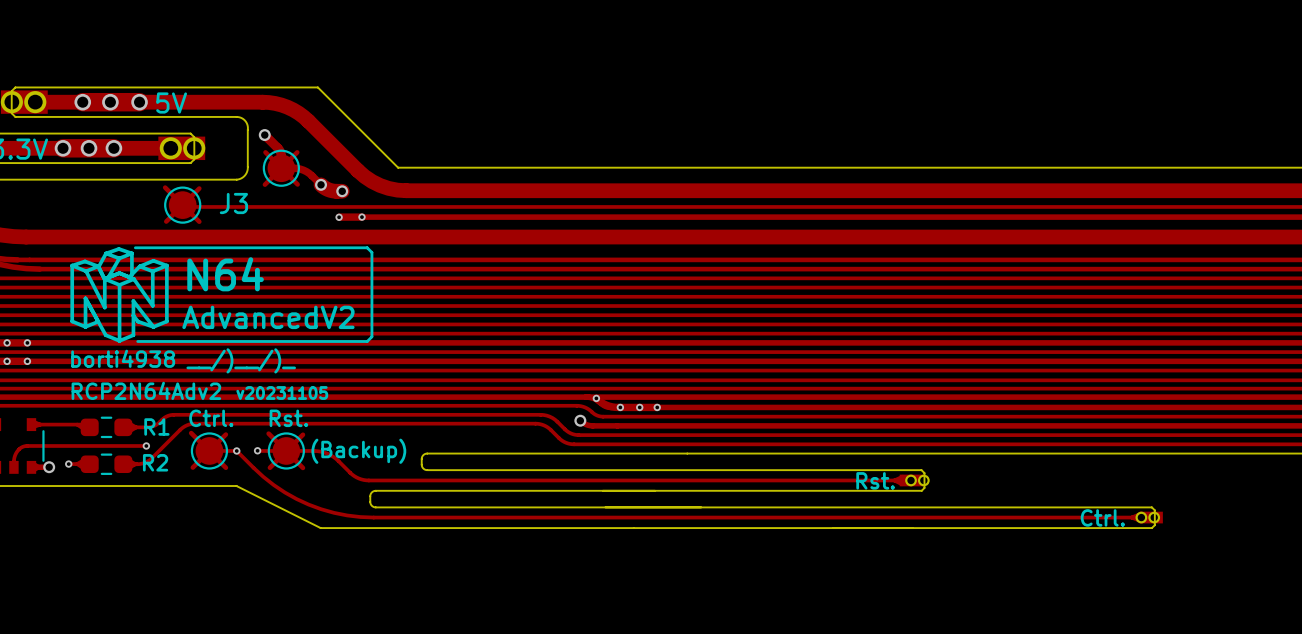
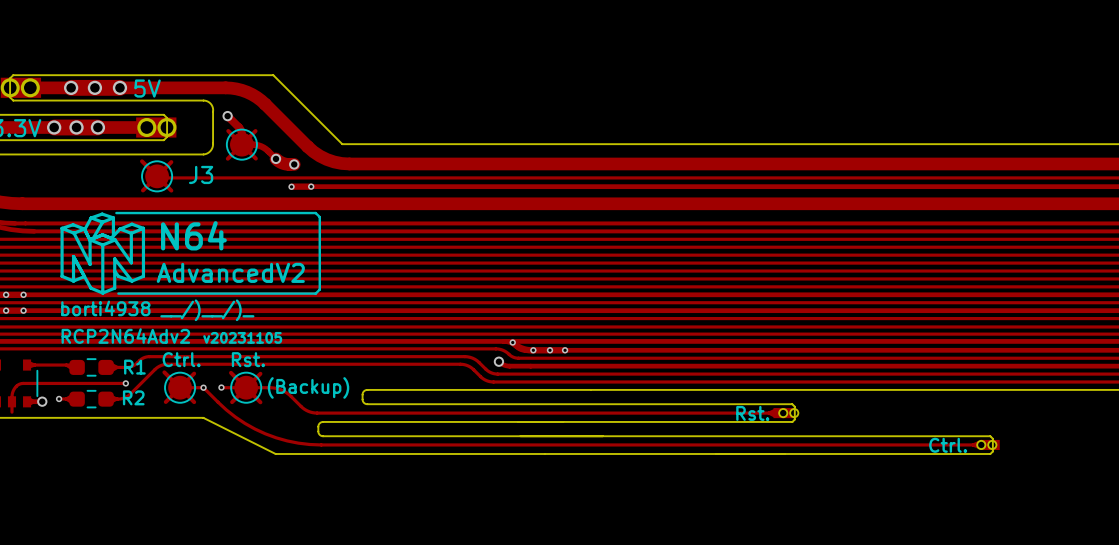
track: none -> (11, 402) (11, 412)

